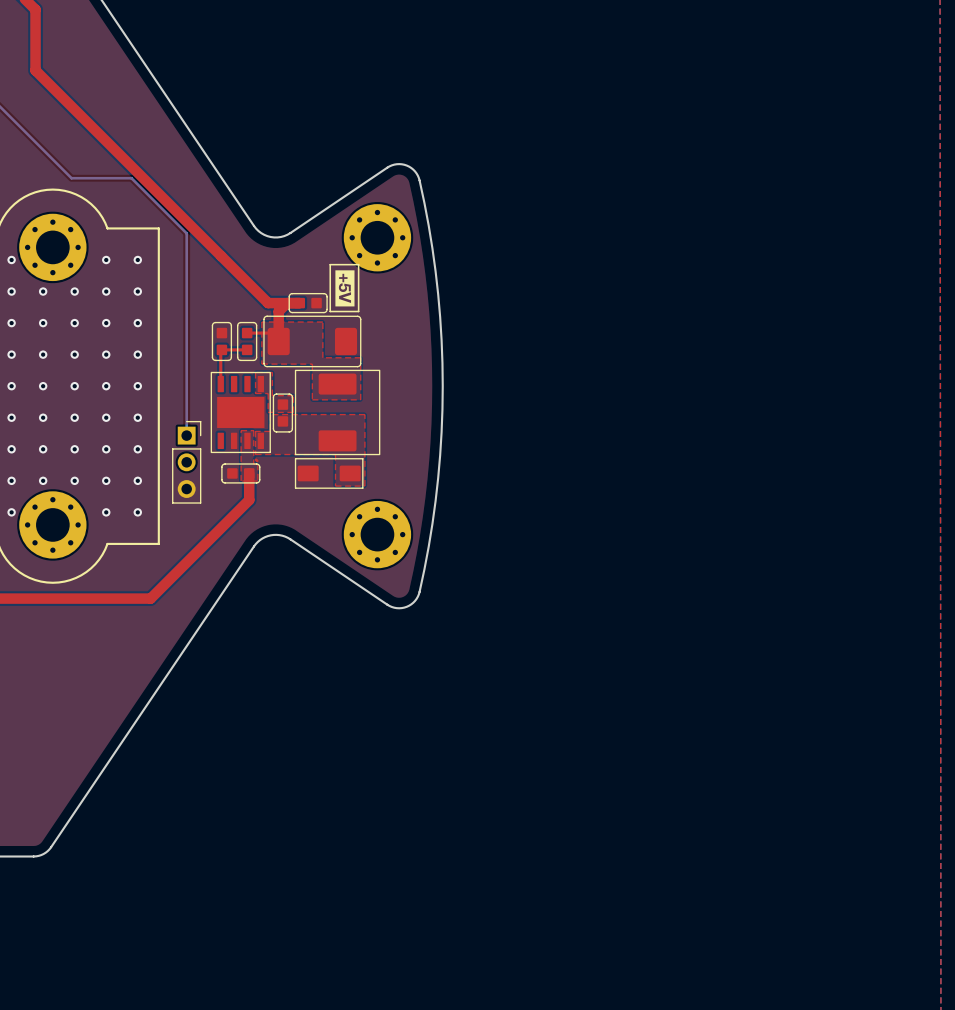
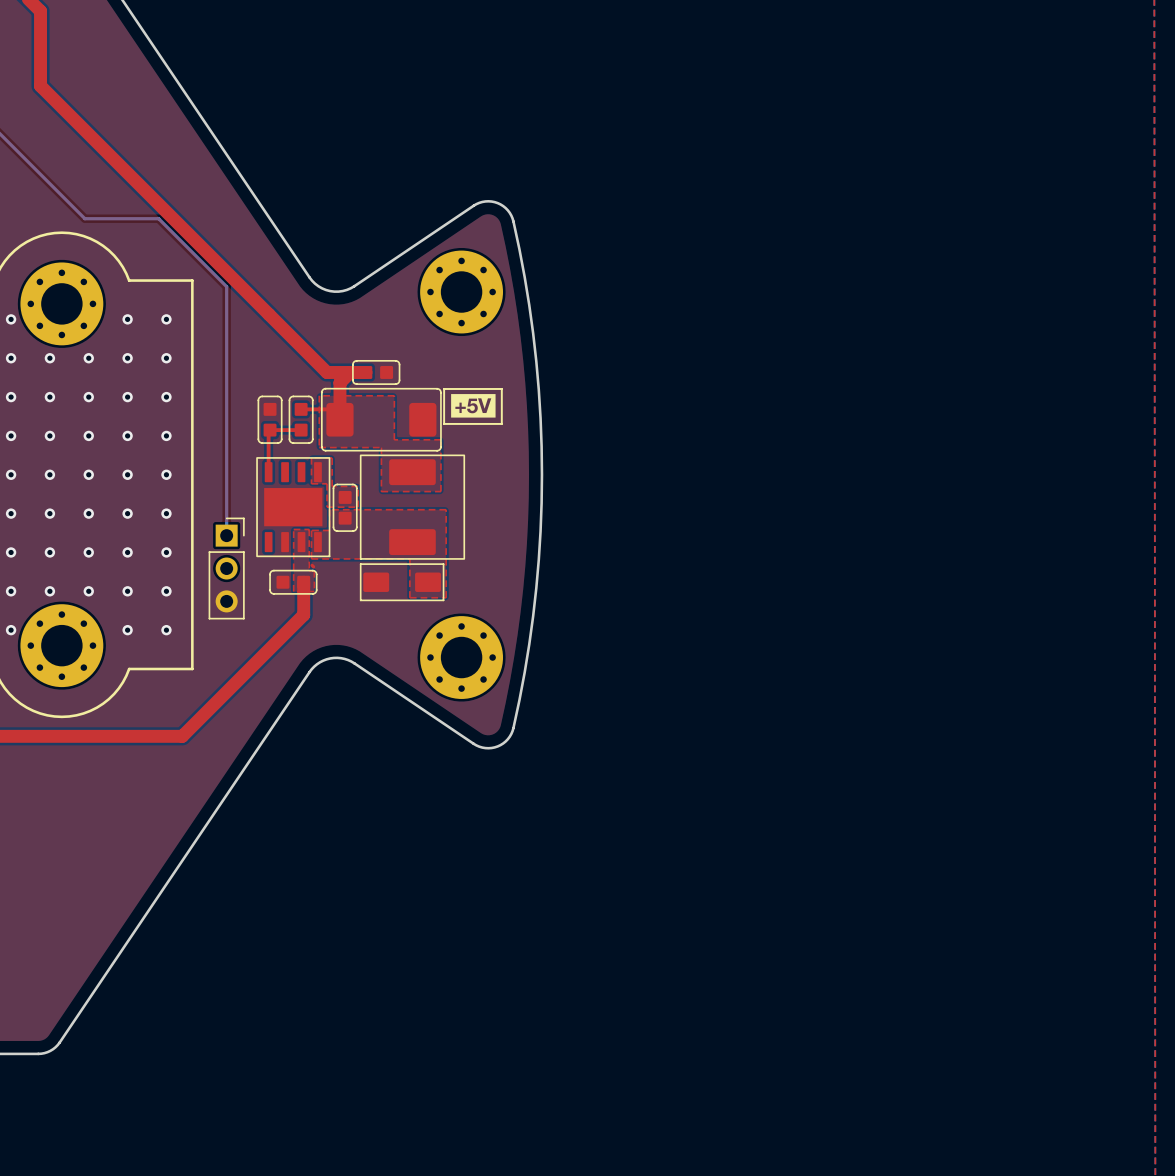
line: (330, 264) (330, 311) (358, 311) (358, 264) (330, 264) -> none
drawing: [335, 270, 355, 307] -> none
line: none -> (501, 388) (444, 388) (444, 423) (501, 423) (501, 388)
drawing: none -> [451, 394, 496, 418]

